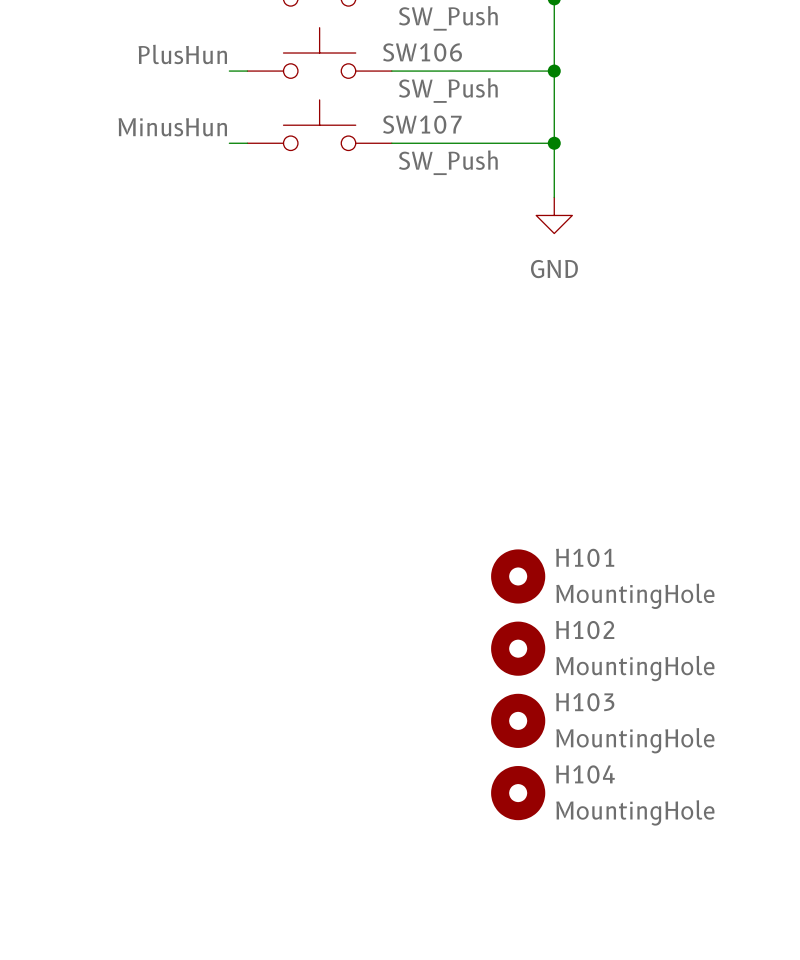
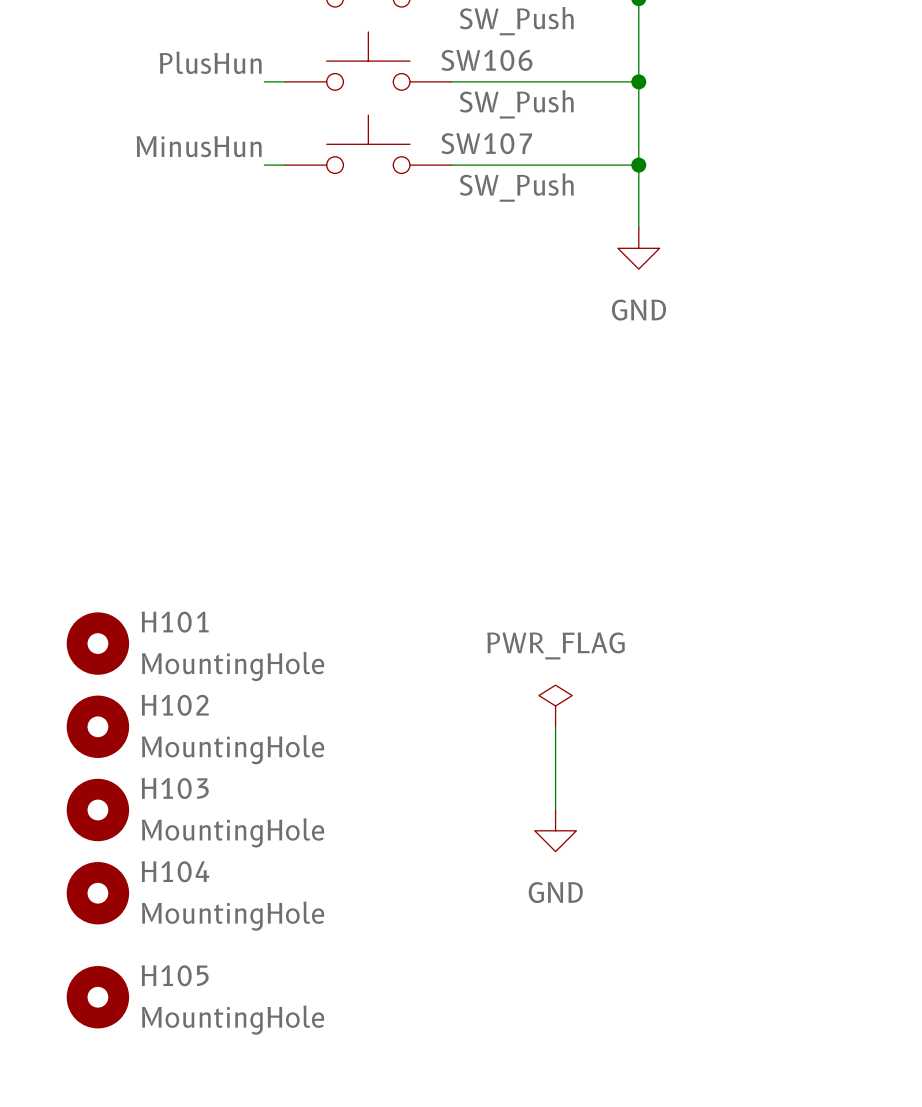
H101 position: (518, 576) -> (97, 643)
power symbol: none -> PWR_FLAG (555, 705)
wire: none -> (555, 726) (555, 810)
H102 position: (518, 648) -> (97, 726)
power symbol: none -> GND (555, 830)
H103 position: (518, 720) -> (97, 810)
H104 position: (518, 793) -> (97, 893)
H105: none -> MountingHole (97, 997)

